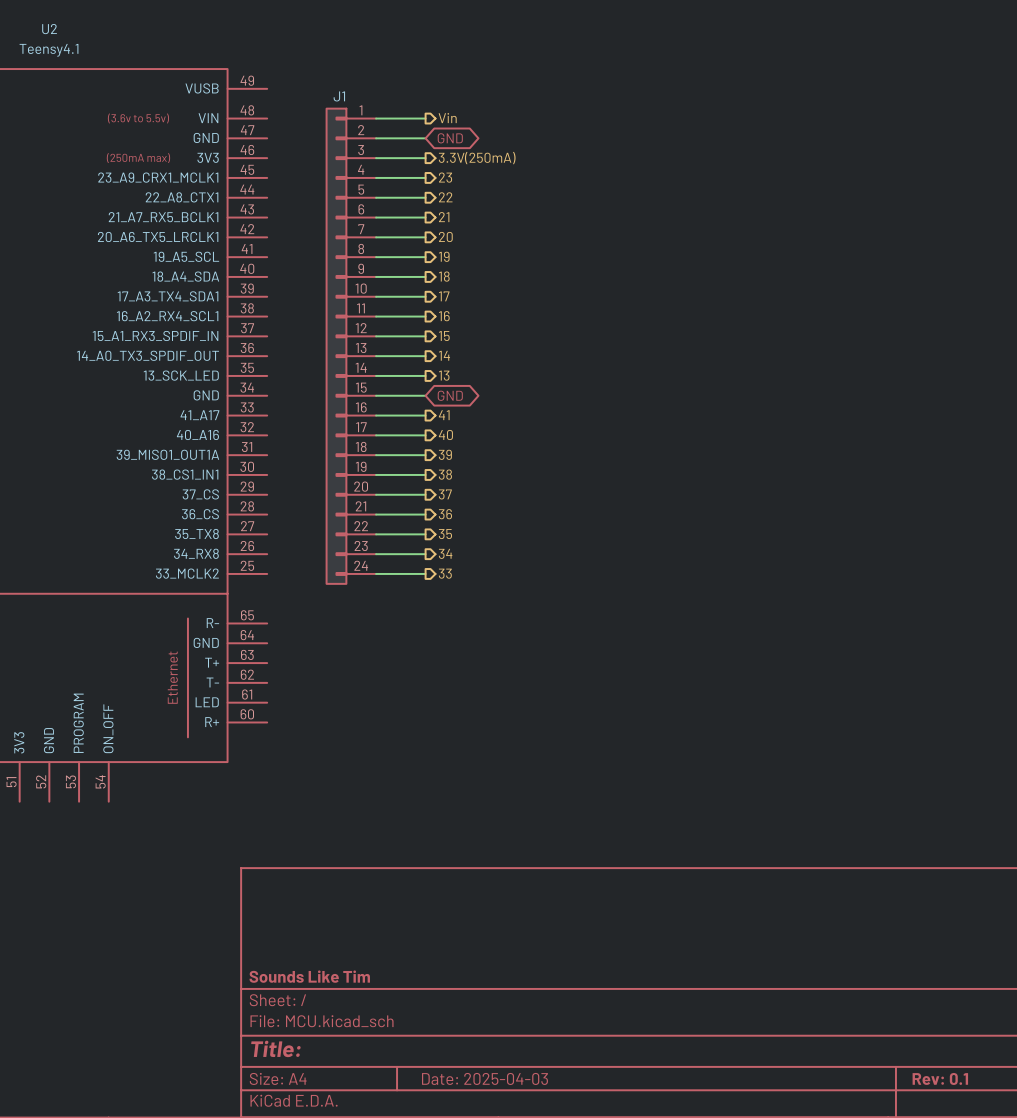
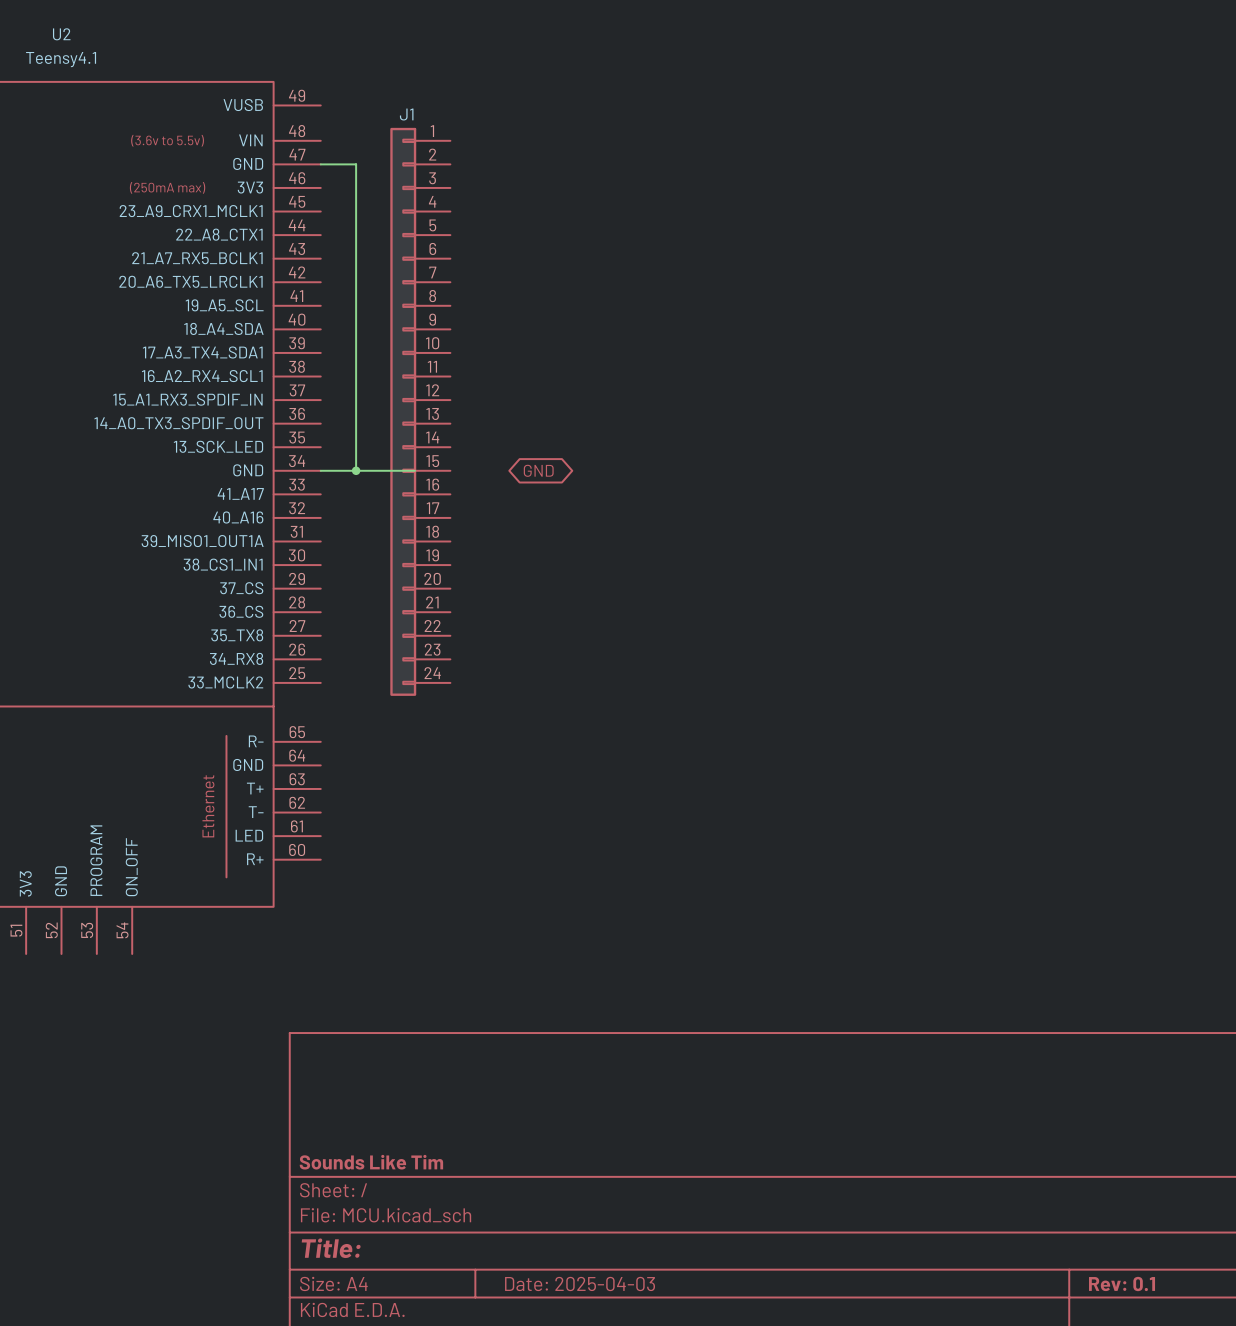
wire: (376, 118) (425, 118) -> none
hierarchical label: Vin (447, 118) -> none
wire: none -> (320, 164) (356, 164) (356, 470)
wire: (376, 138) (425, 138) -> none
global label: GND (450, 138) -> none
wire: (376, 158) (425, 158) -> none
hierarchical label: 3.3V(250mA) (477, 158) -> none
wire: (376, 177) (425, 177) -> none
hierarchical label: 23 (445, 177) -> none
wire: (376, 197) (425, 197) -> none
hierarchical label: 22 (445, 197) -> none
wire: (376, 217) (425, 217) -> none
hierarchical label: 21 (444, 217) -> none
hierarchical label: 20 (445, 236) -> none
wire: (376, 237) (425, 237) -> none
hierarchical label: 19 (444, 256) -> none
wire: (376, 257) (425, 257) -> none
wire: (376, 276) (425, 276) -> none
hierarchical label: 18 (444, 276) -> none
wire: (376, 296) (425, 296) -> none
hierarchical label: 17 (444, 296) -> none
wire: (376, 316) (425, 316) -> none
hierarchical label: 16 (444, 316) -> none
wire: (376, 336) (425, 336) -> none
hierarchical label: 15 (444, 336) -> none
hierarchical label: 14 (444, 355) -> none
wire: (376, 356) (425, 356) -> none
wire: (376, 375) (425, 375) -> none
hierarchical label: 13 (444, 375) -> none
wire: none -> (320, 470) (415, 470)
junction: none -> (356, 470)
wire: (376, 395) (425, 395) -> none
wire: (376, 415) (425, 415) -> none
hierarchical label: 41 (444, 415) -> none
wire: (376, 435) (425, 435) -> none
hierarchical label: 40 (445, 435) -> none
hierarchical label: 39 (445, 454) -> none
wire: (376, 455) (425, 455) -> none
wire: (376, 474) (425, 474) -> none
hierarchical label: 38 (445, 474) -> none
wire: (376, 494) (425, 494) -> none
hierarchical label: 37 (445, 494) -> none
wire: (376, 514) (425, 514) -> none
hierarchical label: 36 (445, 514) -> none
wire: (376, 534) (425, 534) -> none
hierarchical label: 35 (445, 534) -> none
hierarchical label: 34 (445, 553) -> none
wire: (376, 554) (425, 554) -> none
wire: (376, 573) (425, 573) -> none
hierarchical label: 33 (445, 573) -> none

